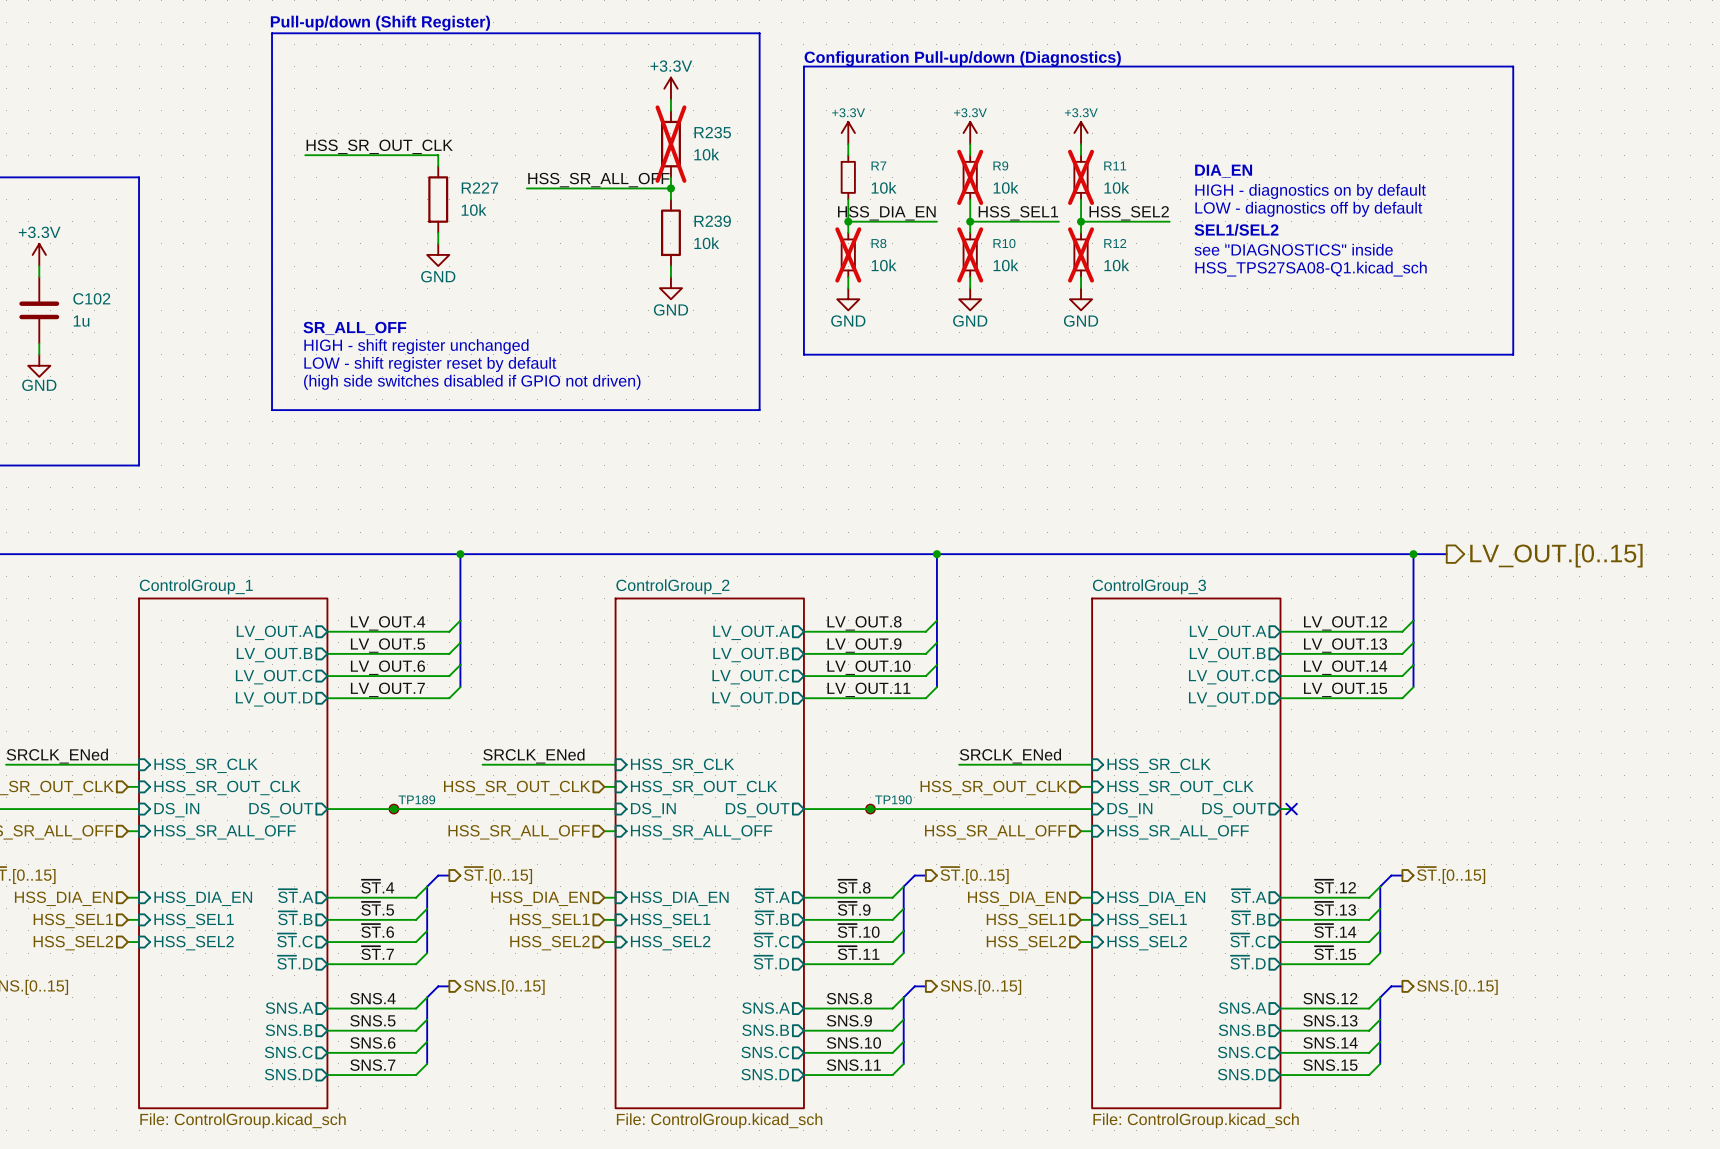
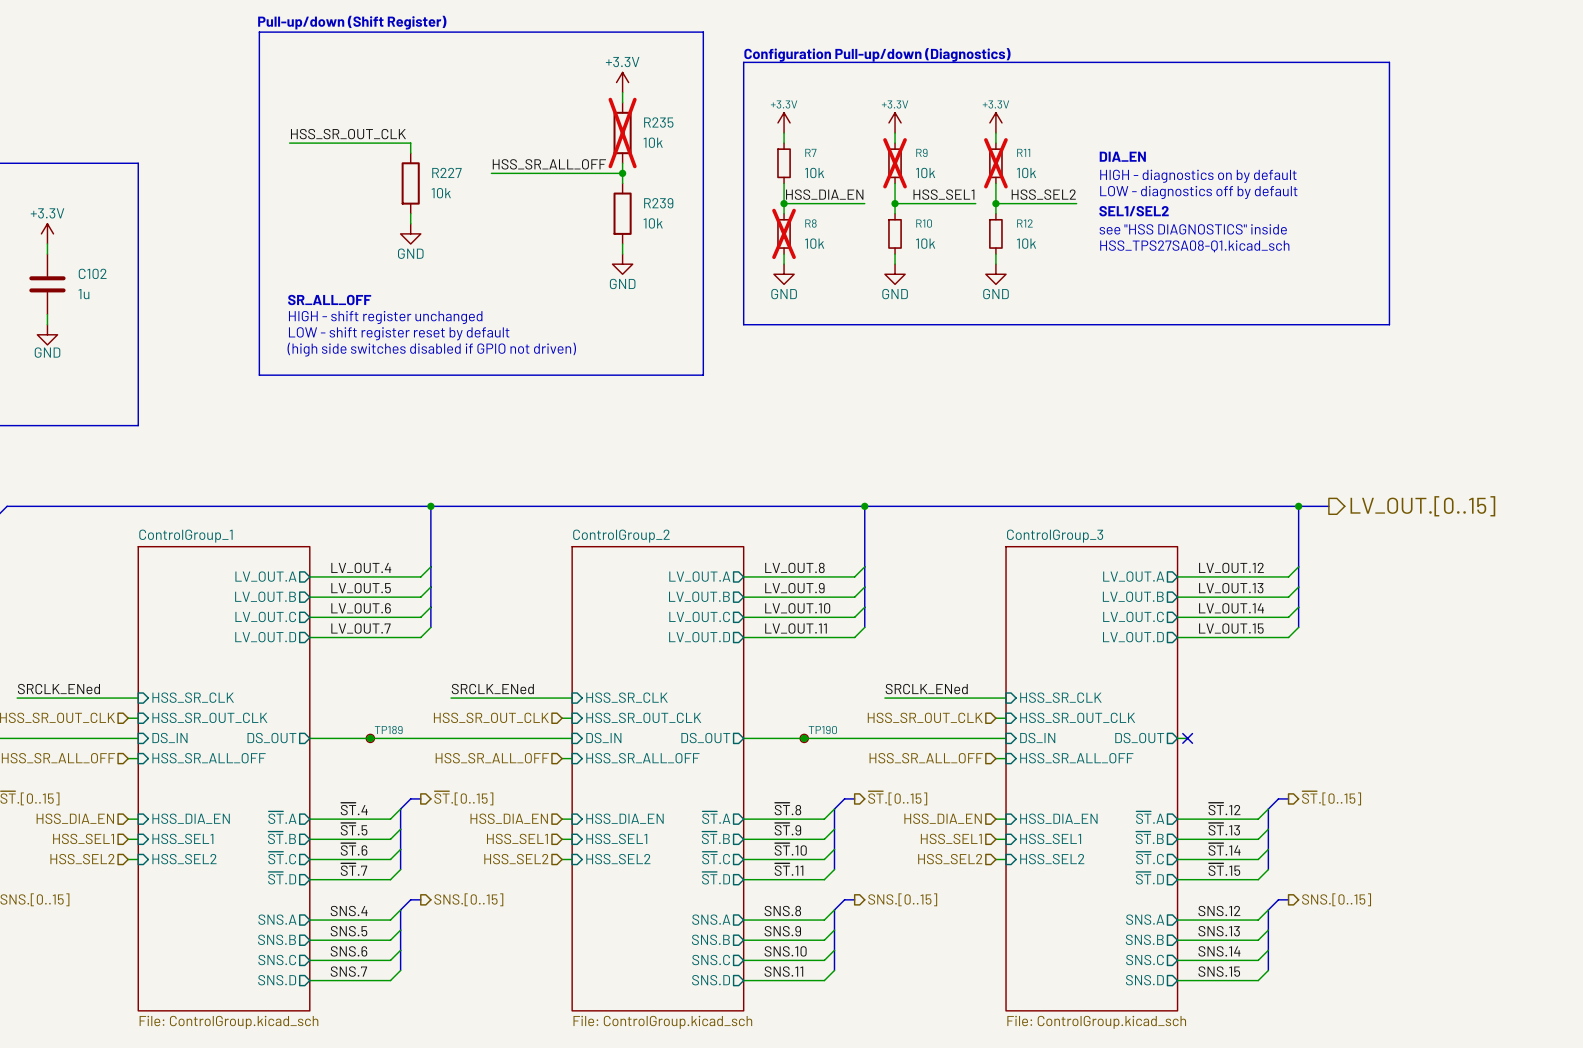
text: see "DIAGNOSTICS" inside (1293, 249) -> see "HSS DIAGNOSTICS" inside (1193, 229)
R10 do-not-place cross: (970, 254) -> none
R12 do-not-place cross: (1081, 254) -> none

